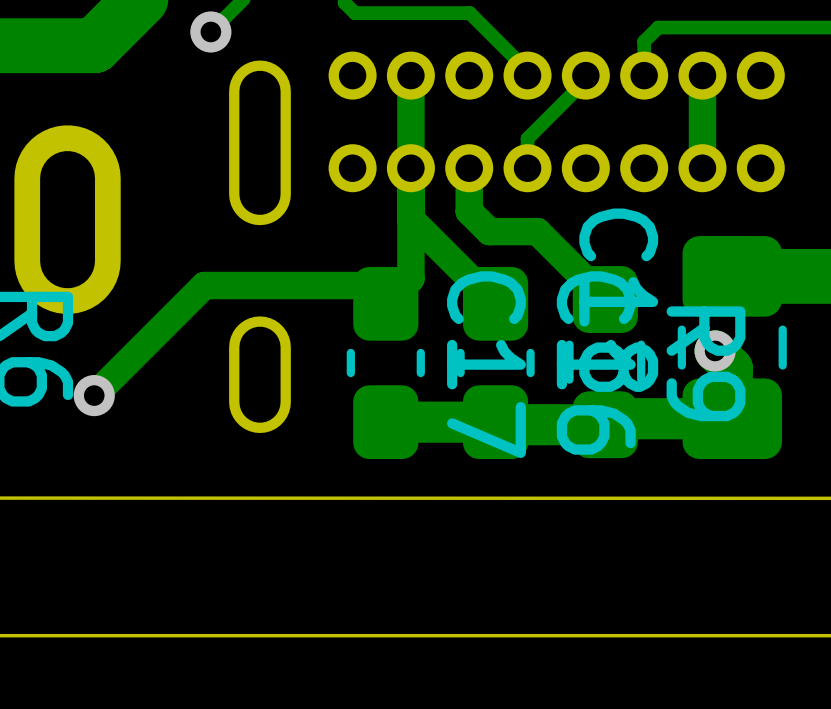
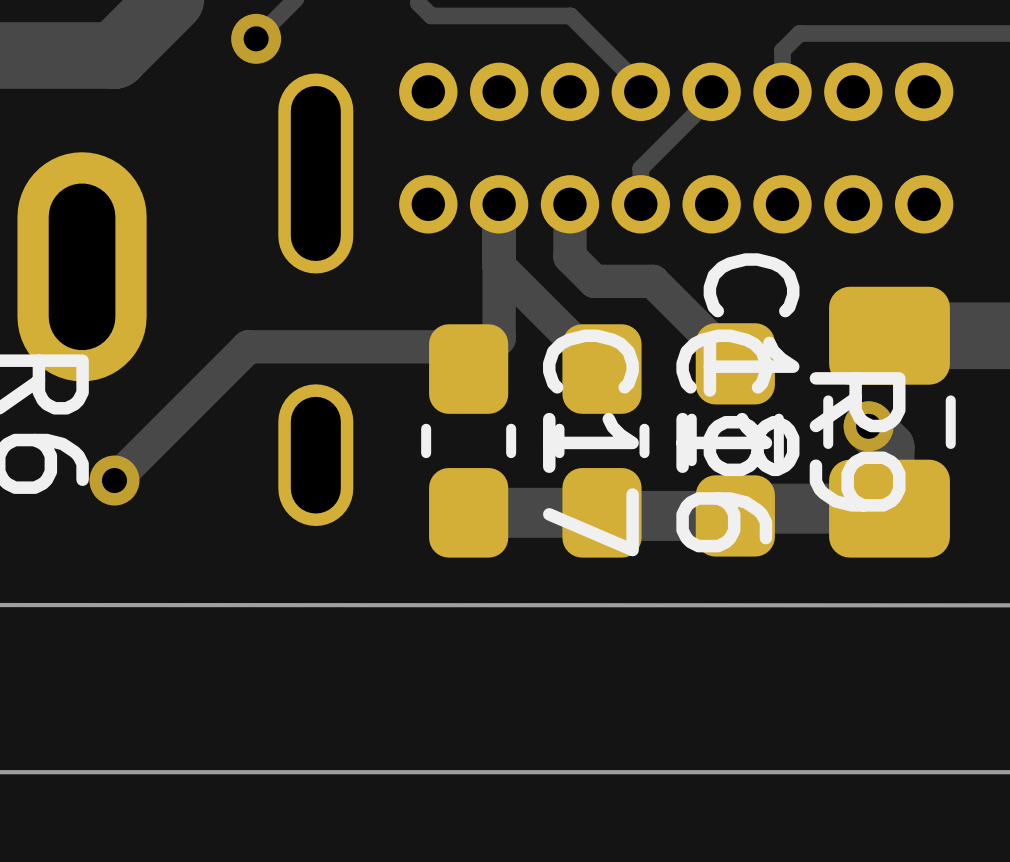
track: (410, 75) (410, 168) -> none
track: (702, 75) (702, 168) -> none

